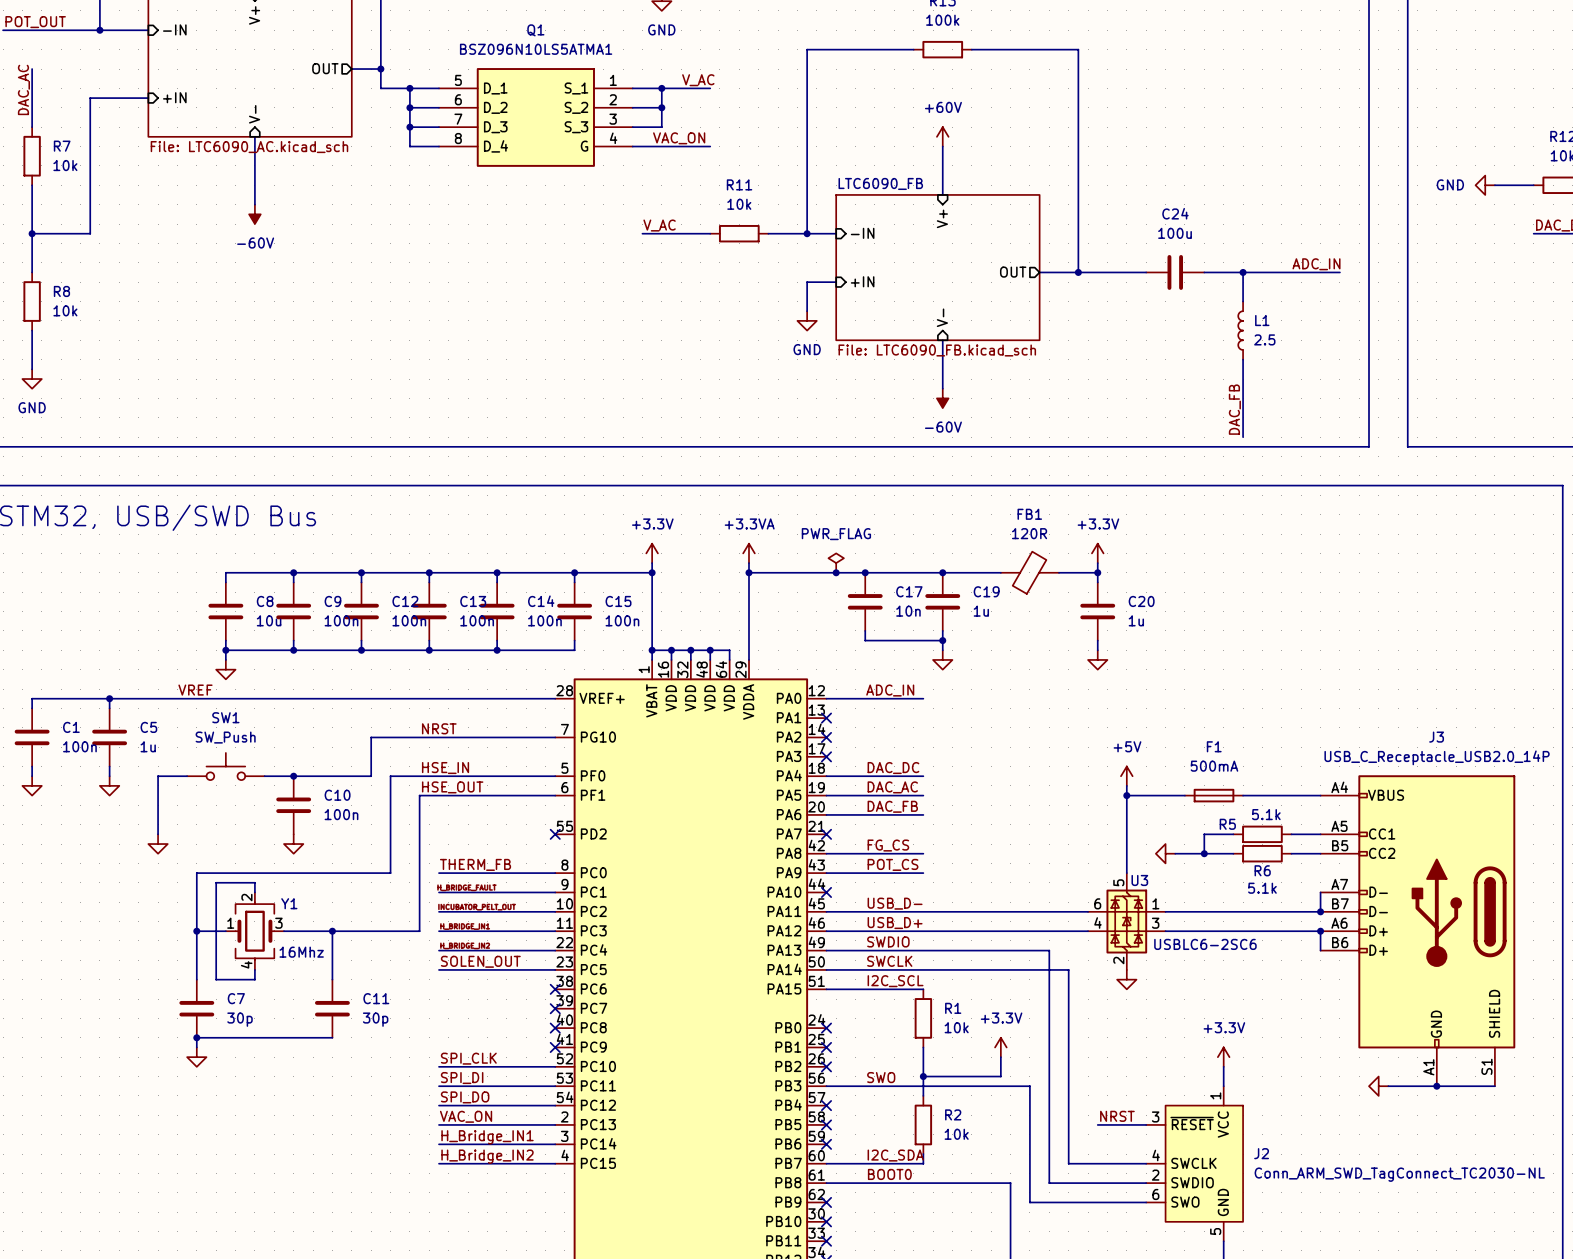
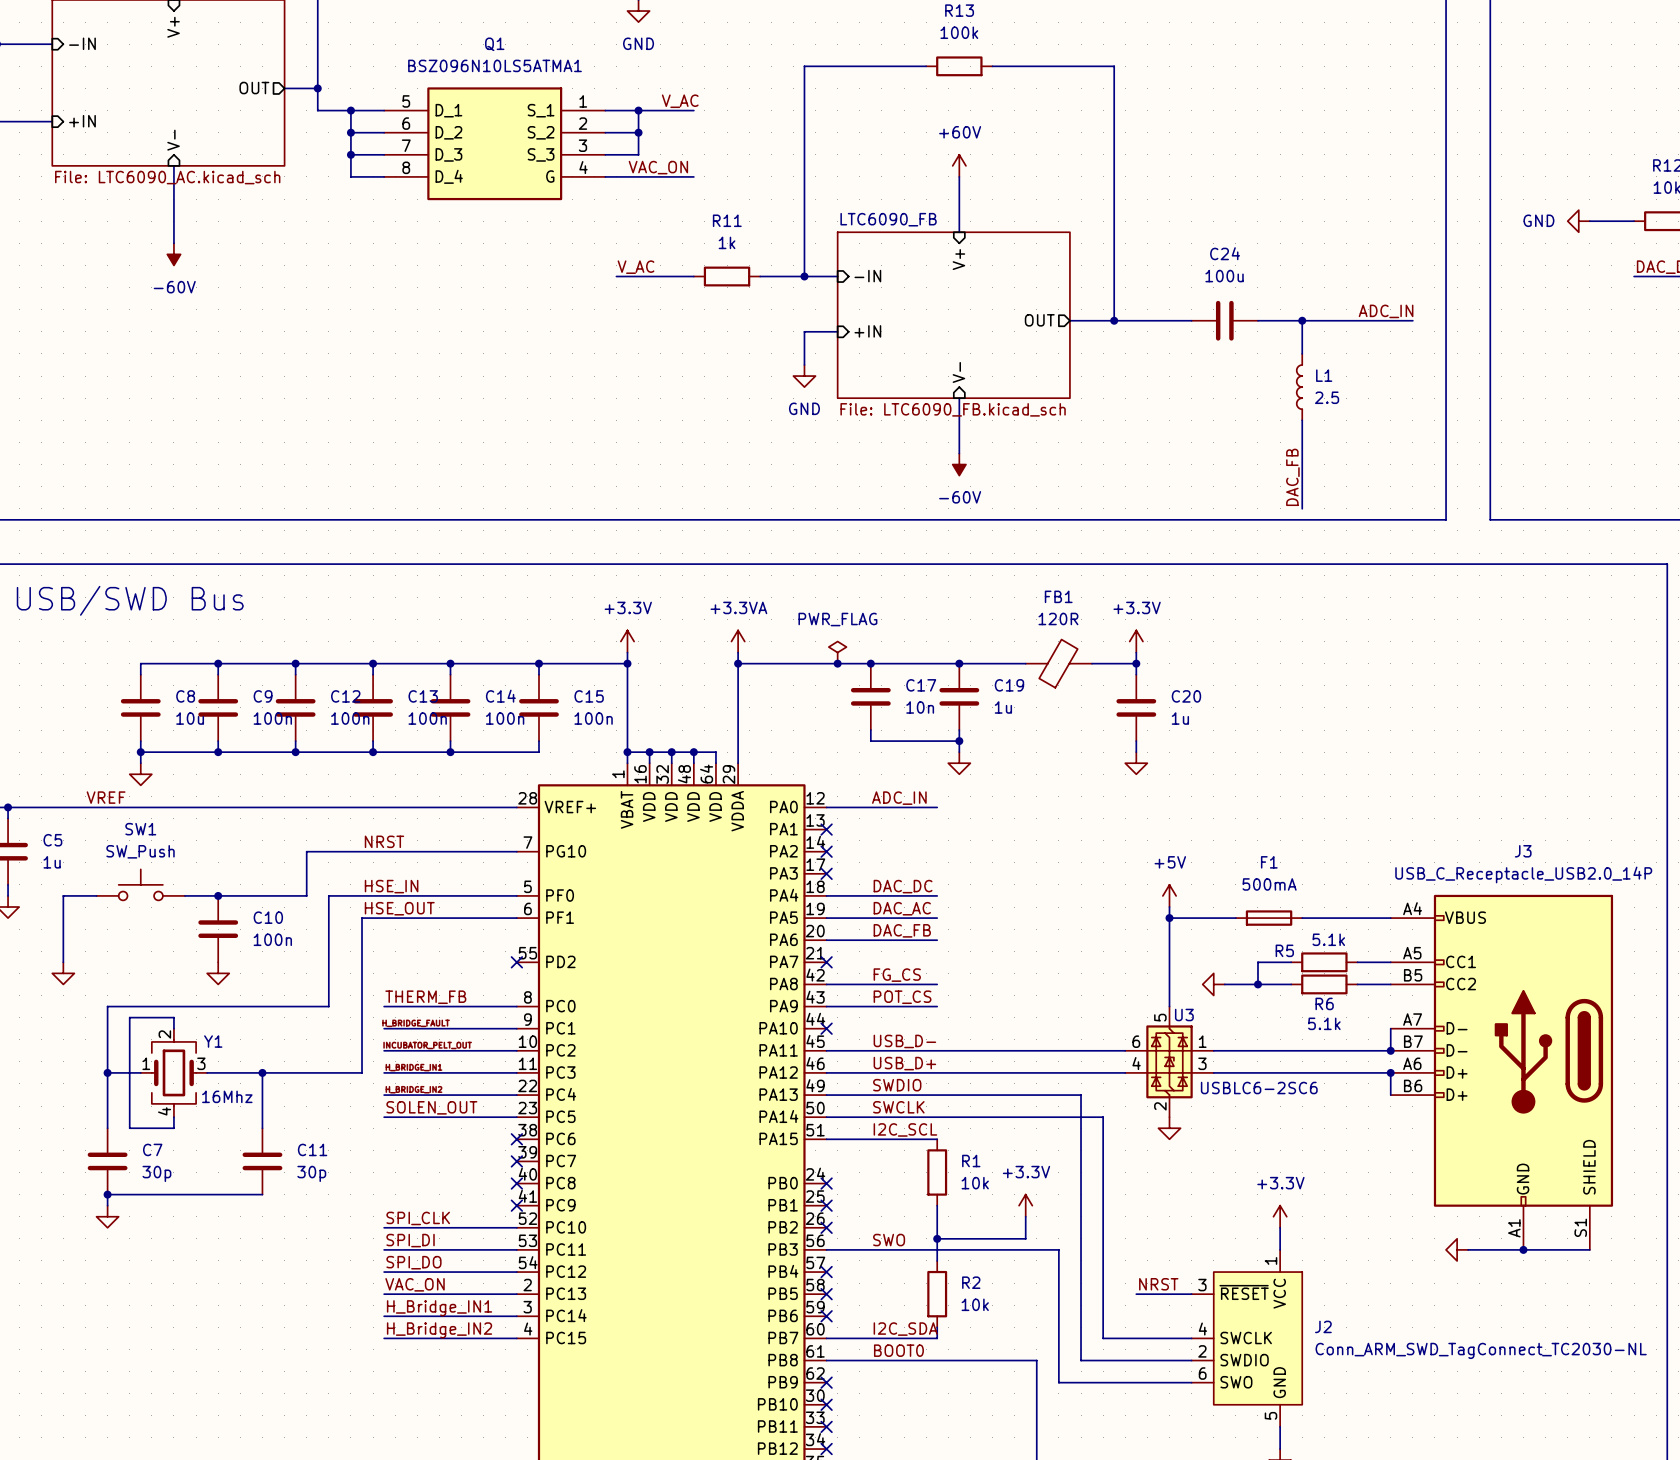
R11 value: 10k (739, 204) -> 1k (727, 242)

